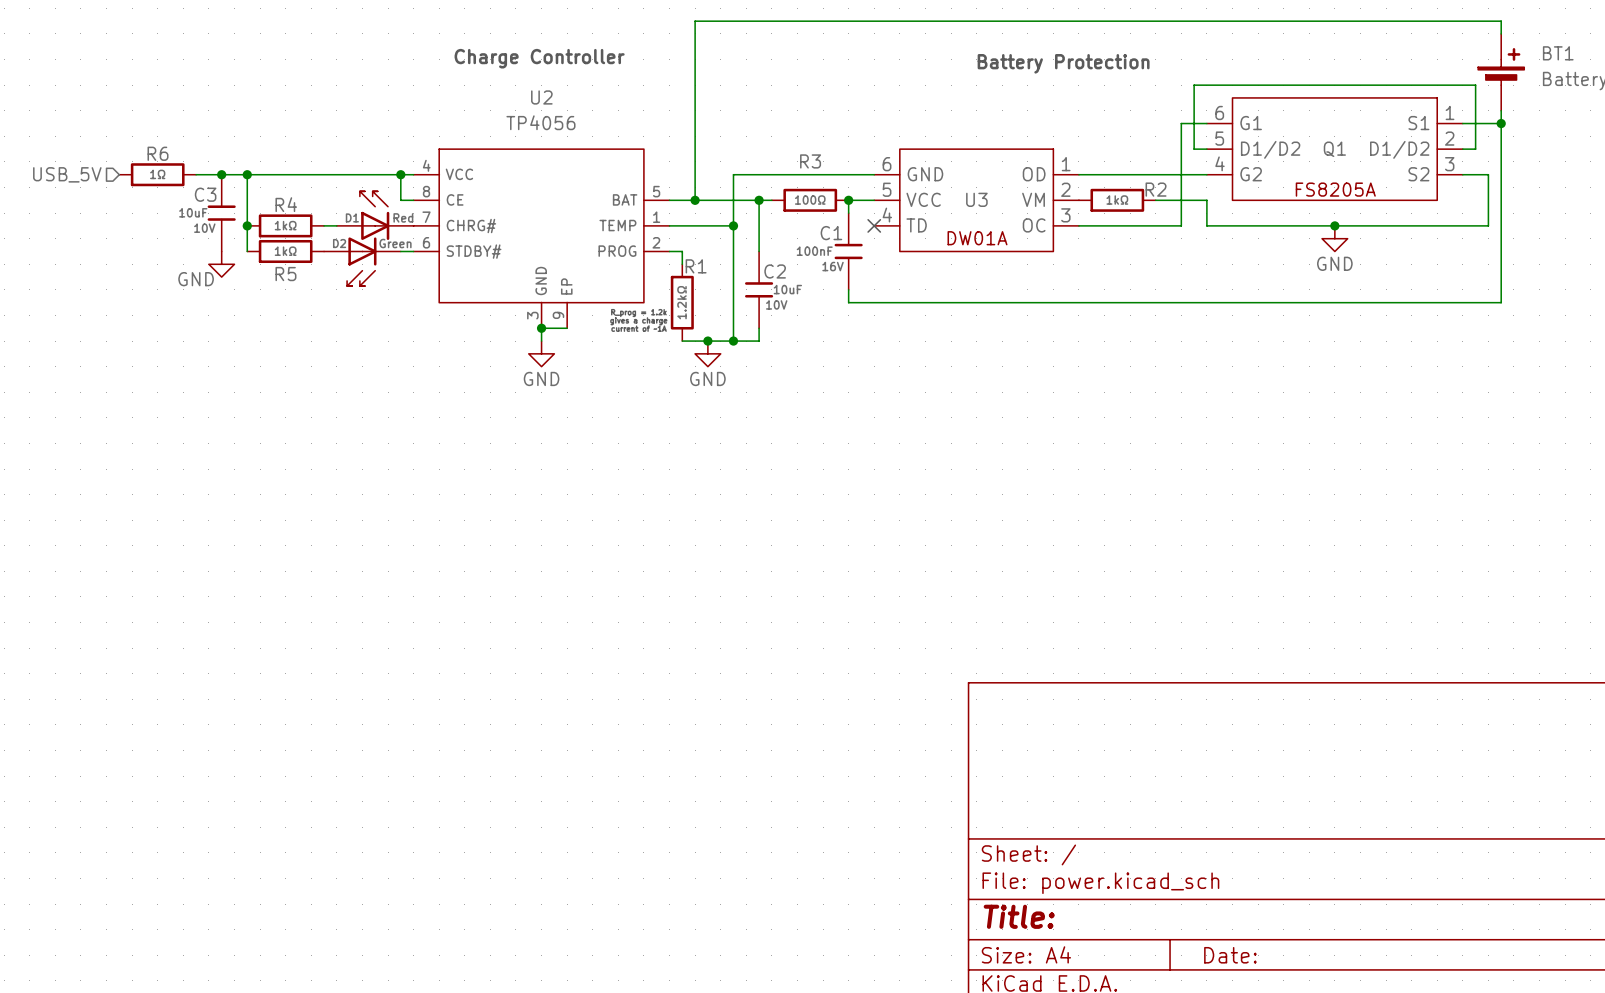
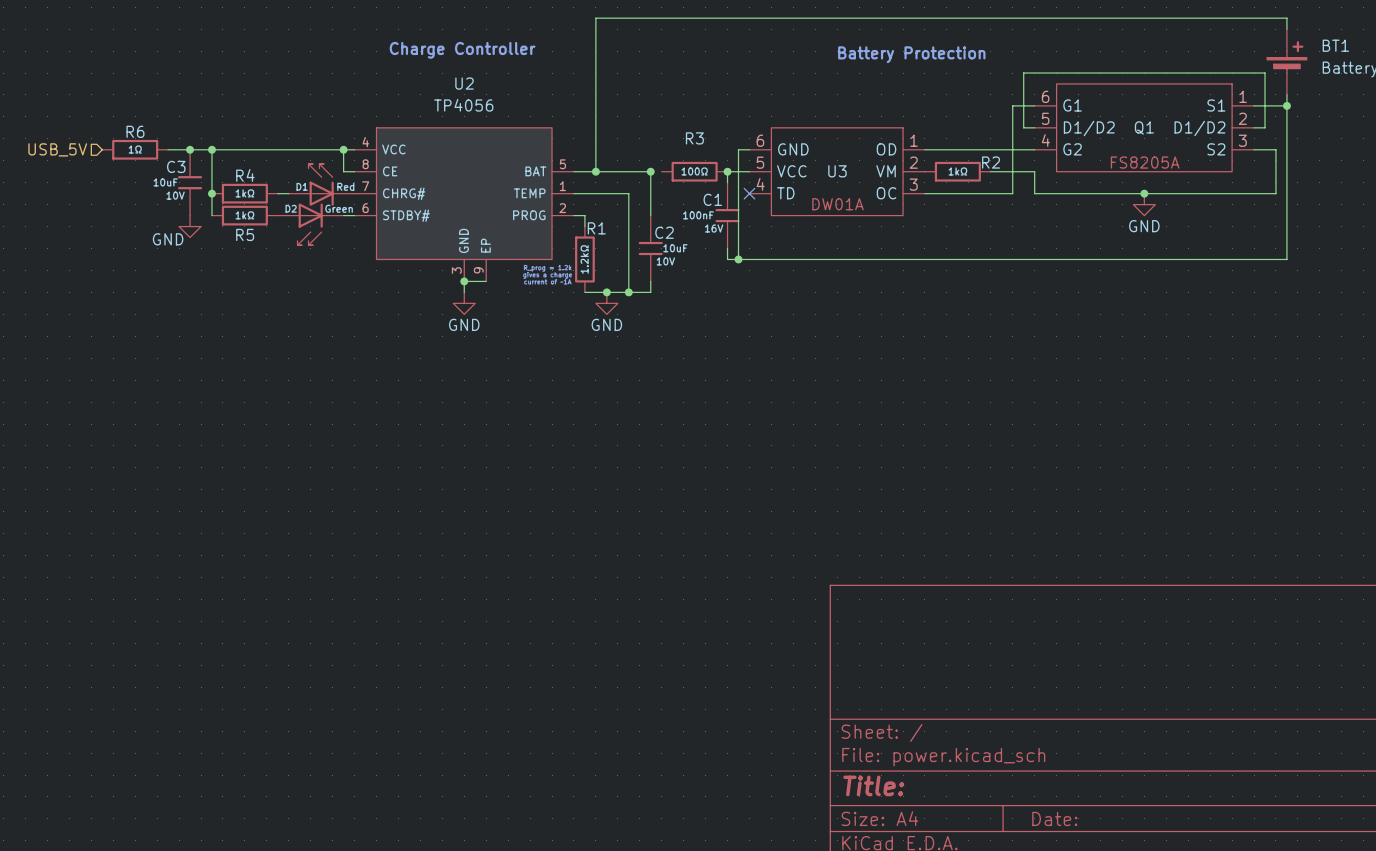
wire: (861, 174) (733, 174) (733, 225) -> (738, 149) (738, 259)
wire: (759, 200) (771, 200) -> none
junction: (733, 225) -> none
junction: none -> (738, 259)

